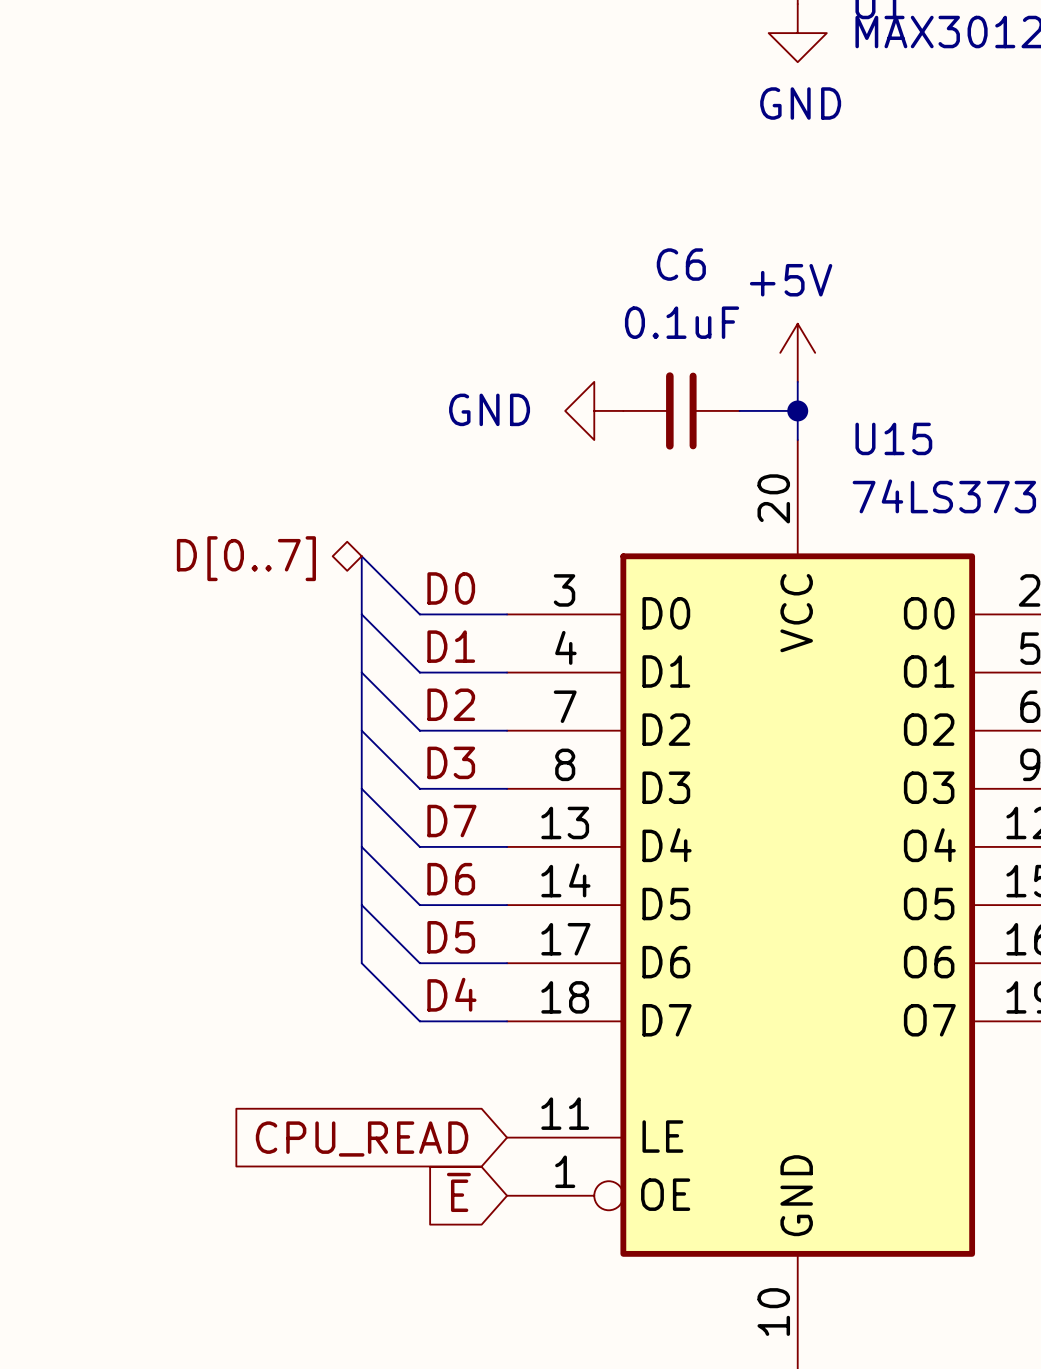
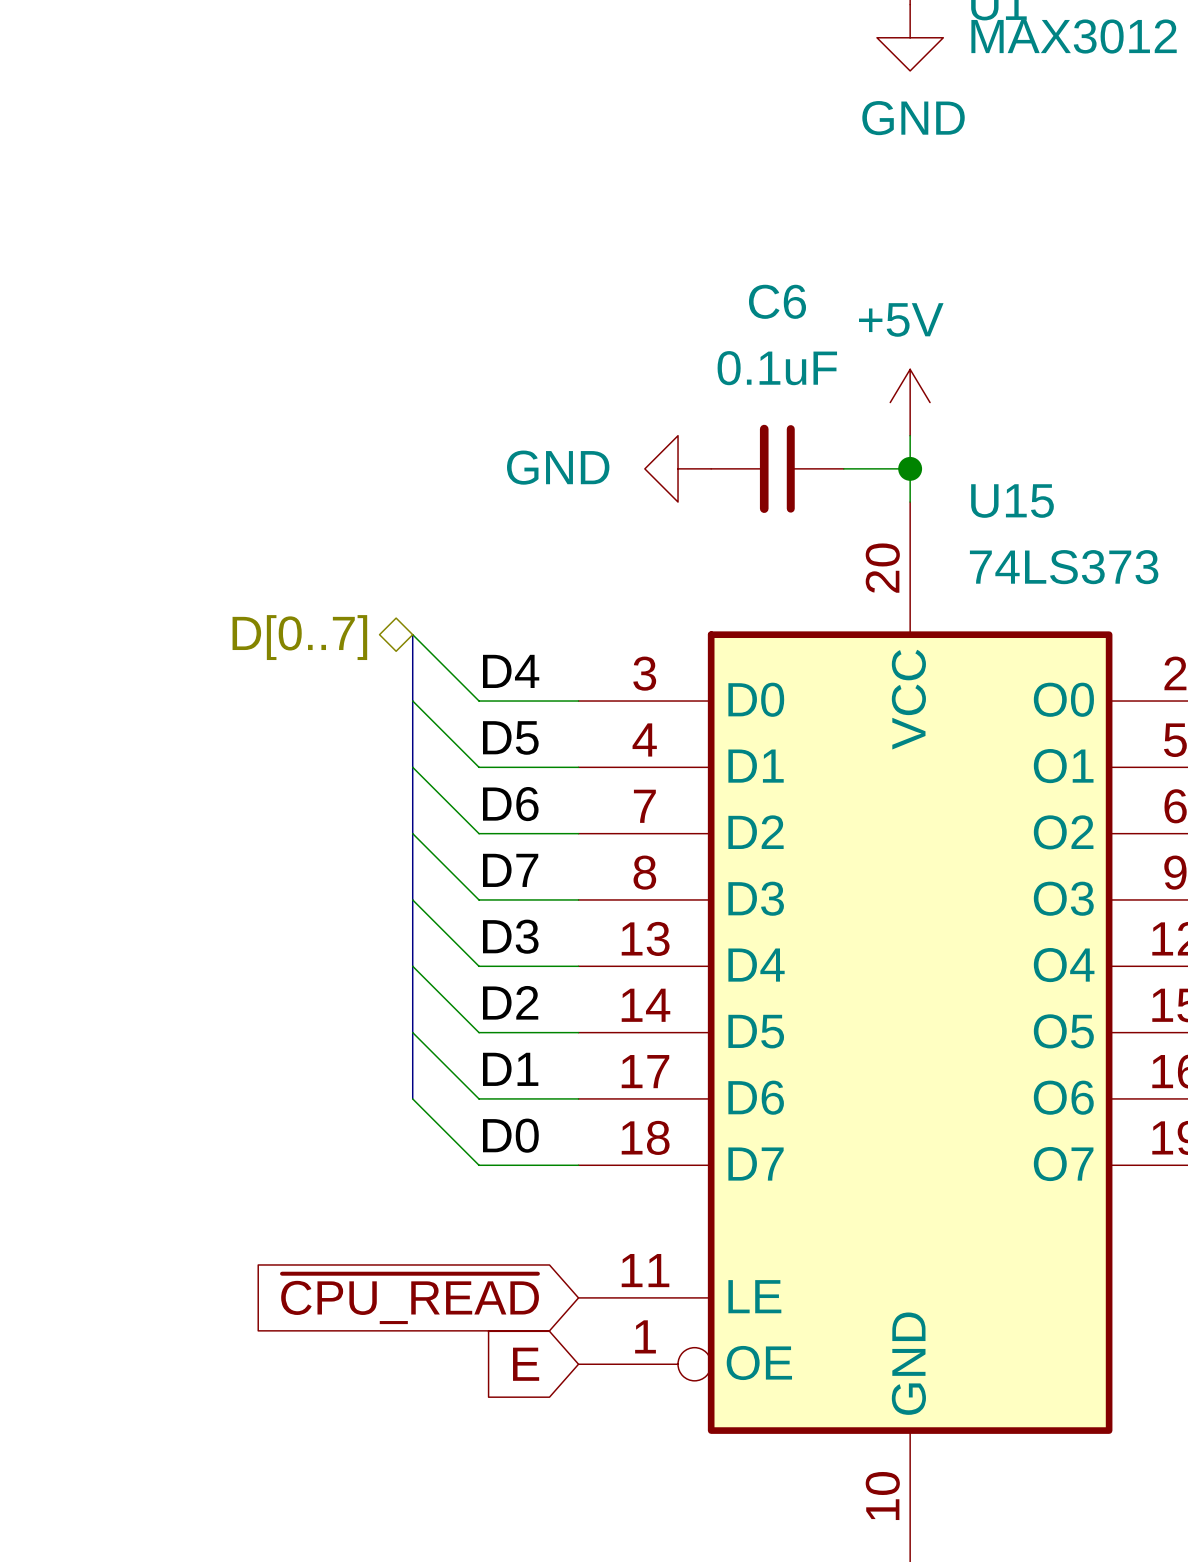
label: D0 (451, 588) -> D4 (511, 671)
label: D1 (451, 646) -> D5 (510, 737)
label: D2 (451, 704) -> D6 (510, 804)
label: D3 (451, 762) -> D7 (510, 870)
label: D7 (451, 821) -> D3 (510, 936)
label: D6 (451, 879) -> D2 (510, 1002)
label: D5 (451, 937) -> D1 (510, 1069)
label: D4 (451, 994) -> D0 (510, 1135)
global label: CPU_READ (362, 1139) -> ~{CPU_READ} (410, 1298)
global label: ~{E} (458, 1192) -> E (526, 1364)

